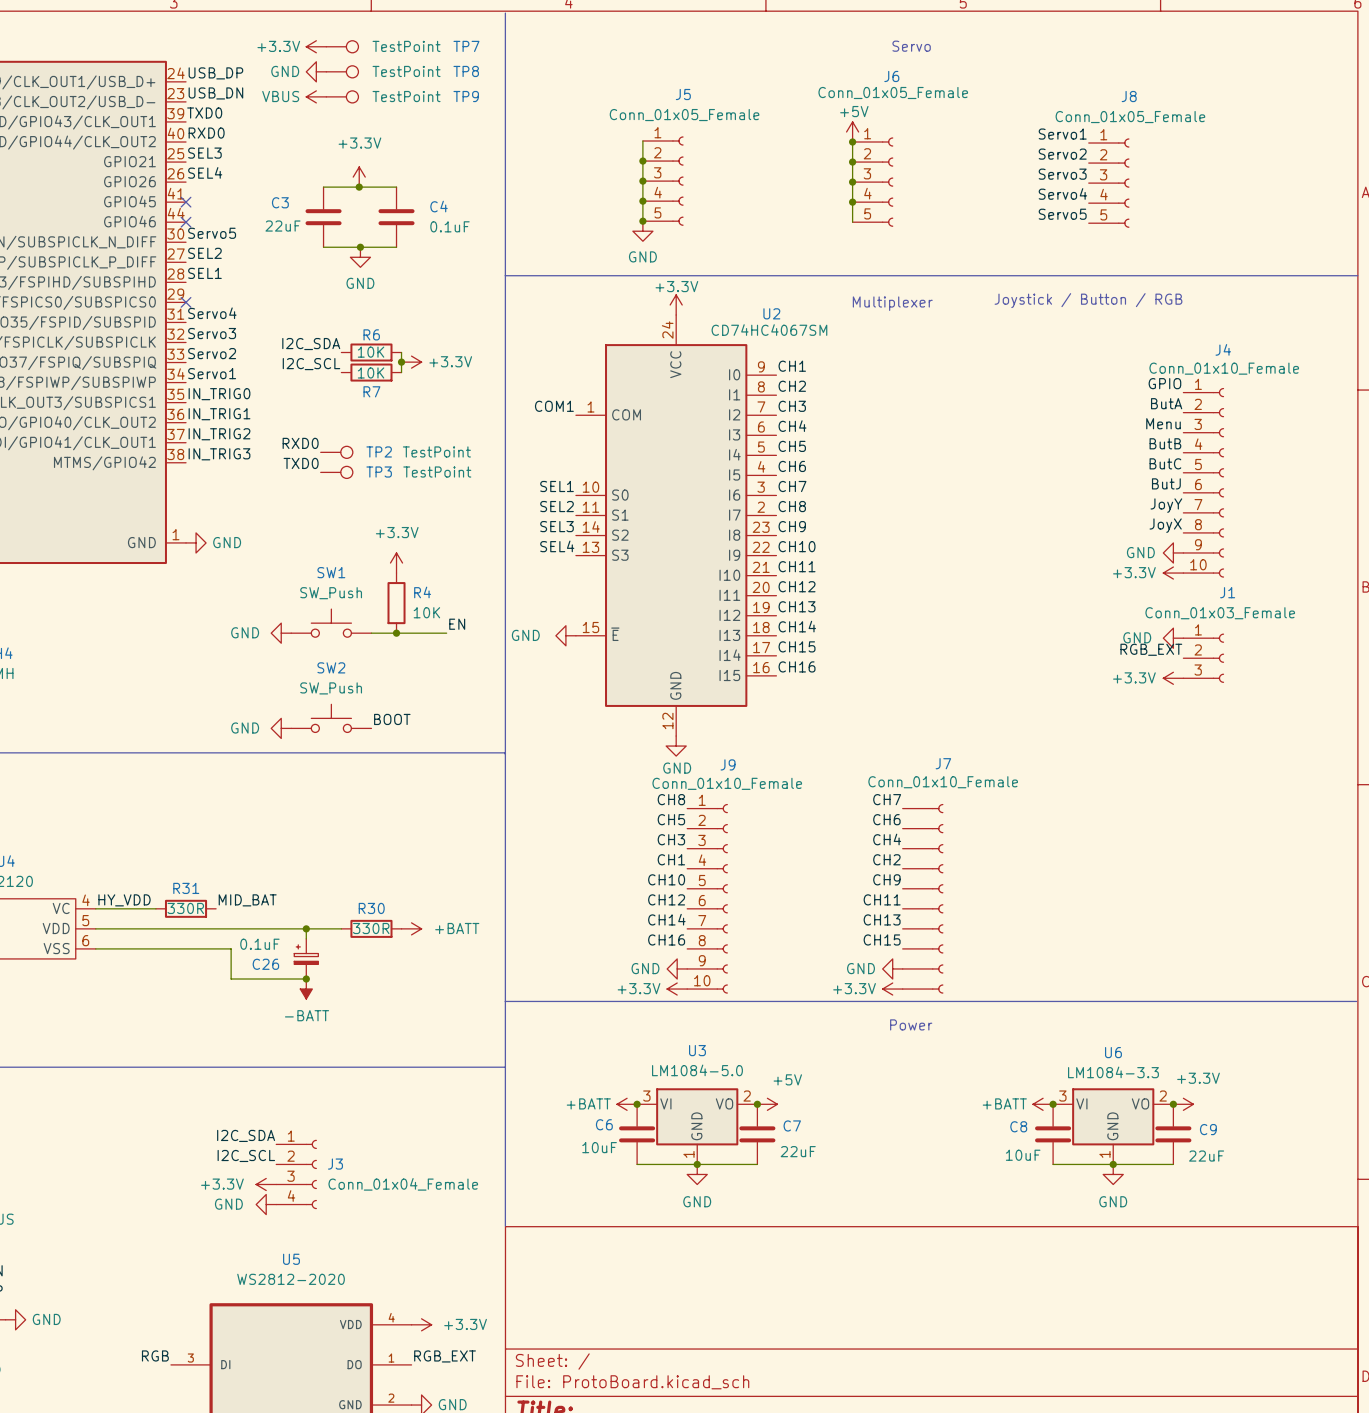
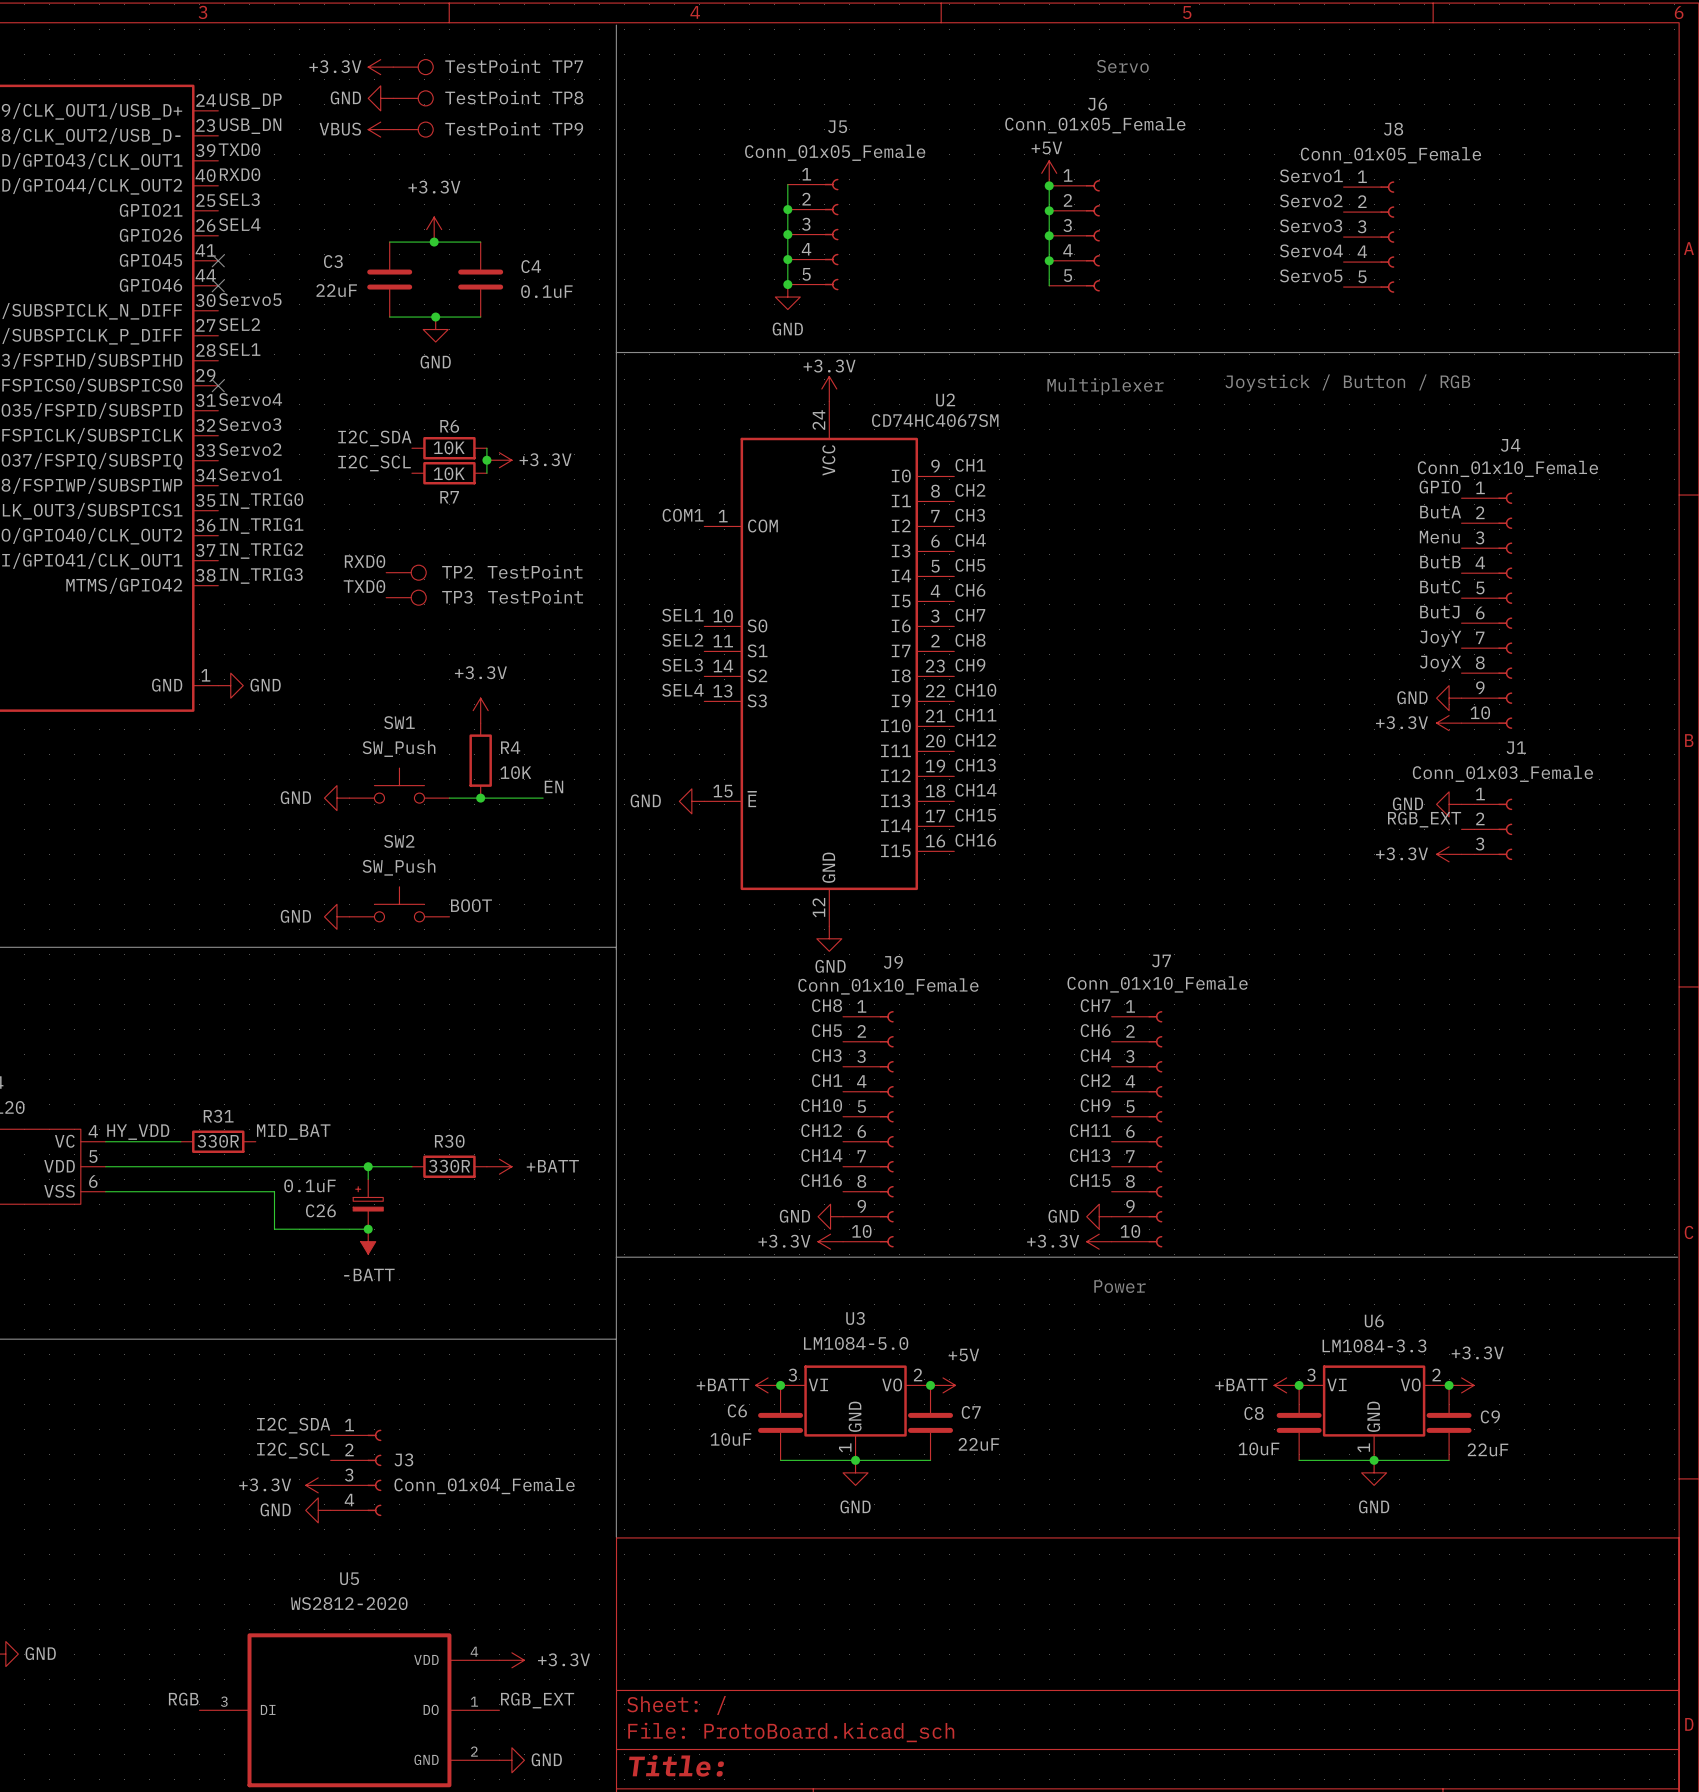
J7 symbol: [902, 803, 944, 994] -> [1111, 1011, 1163, 1248]

